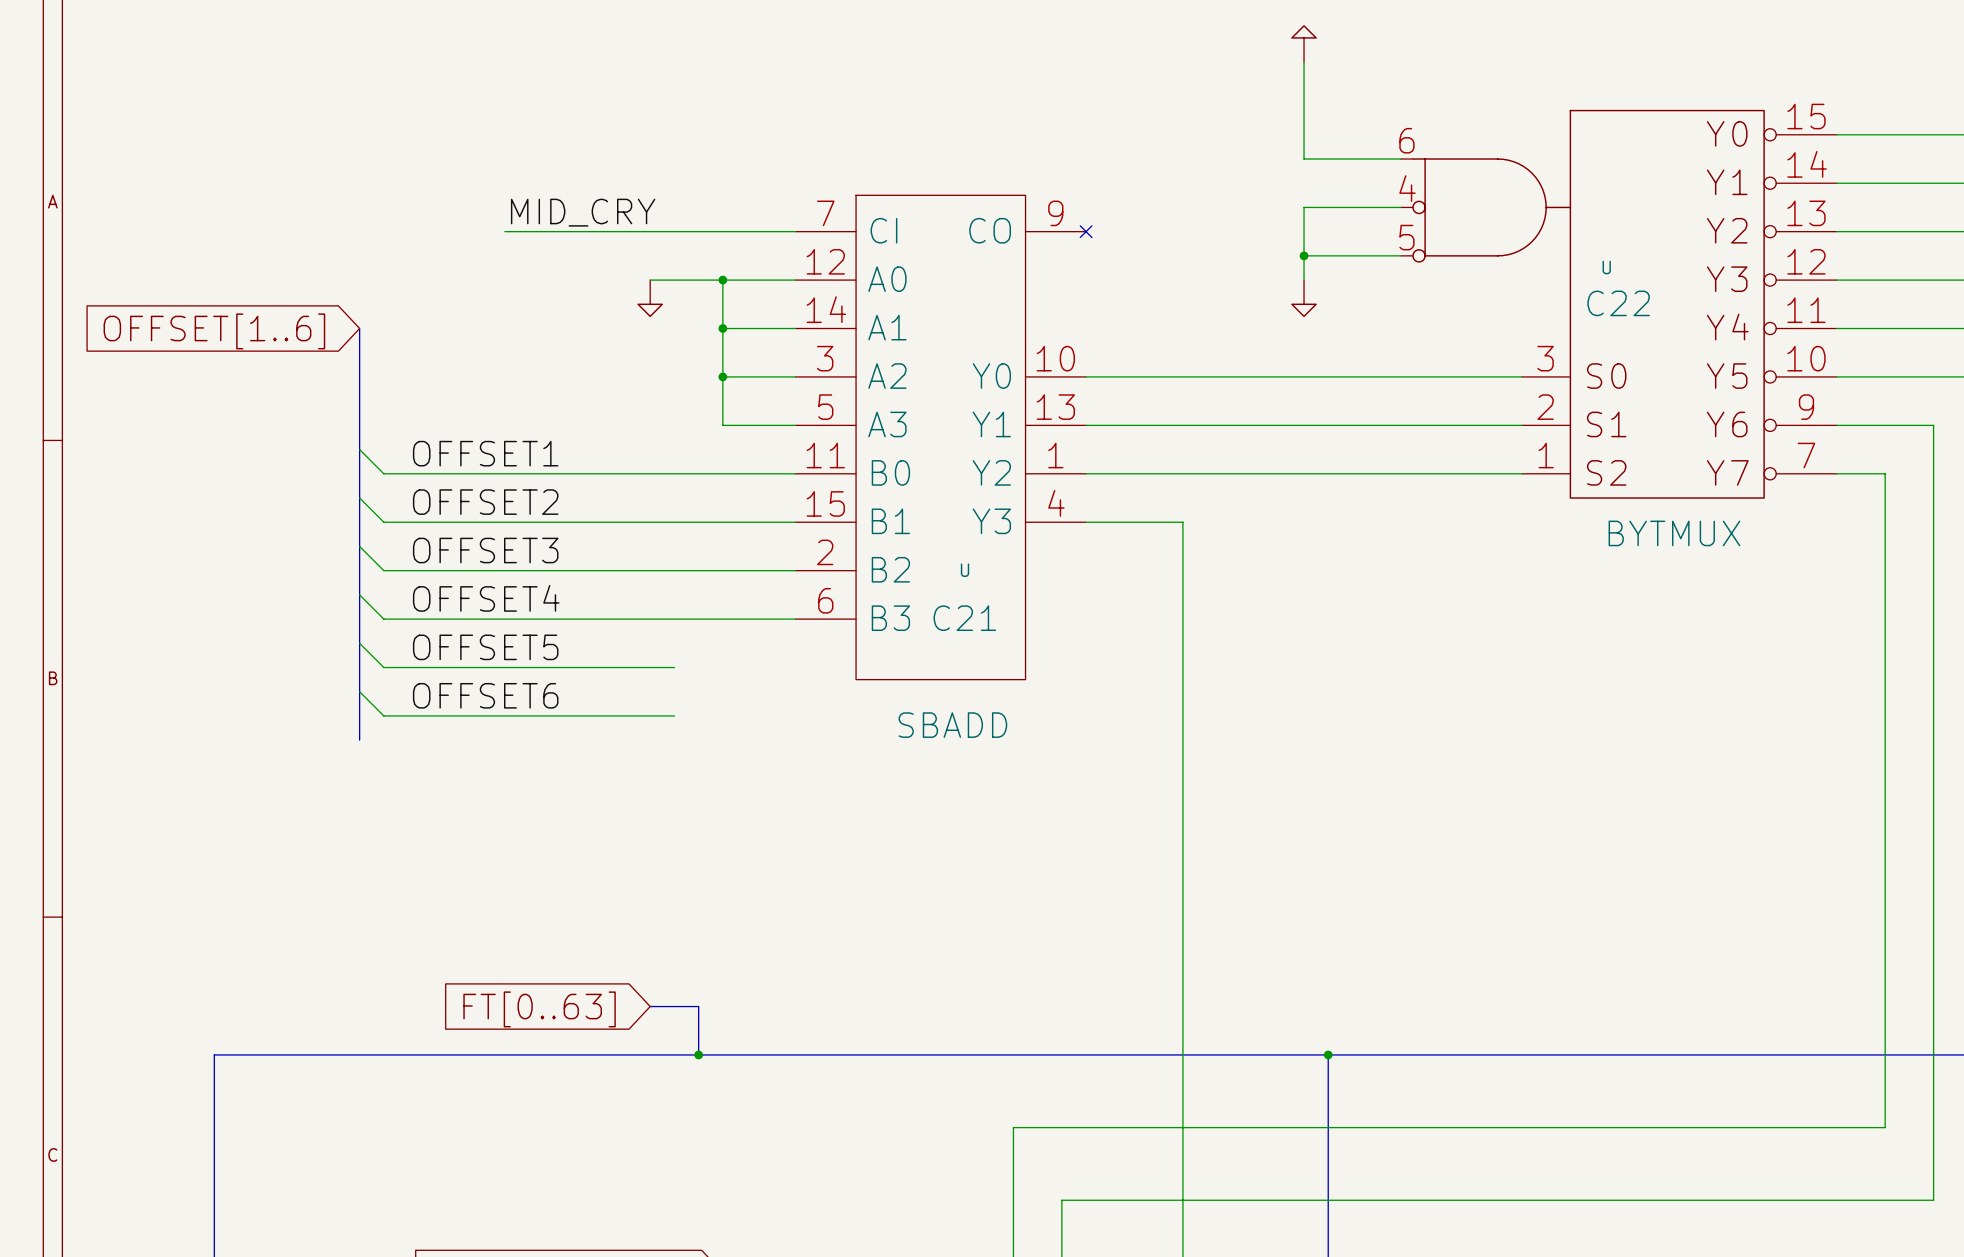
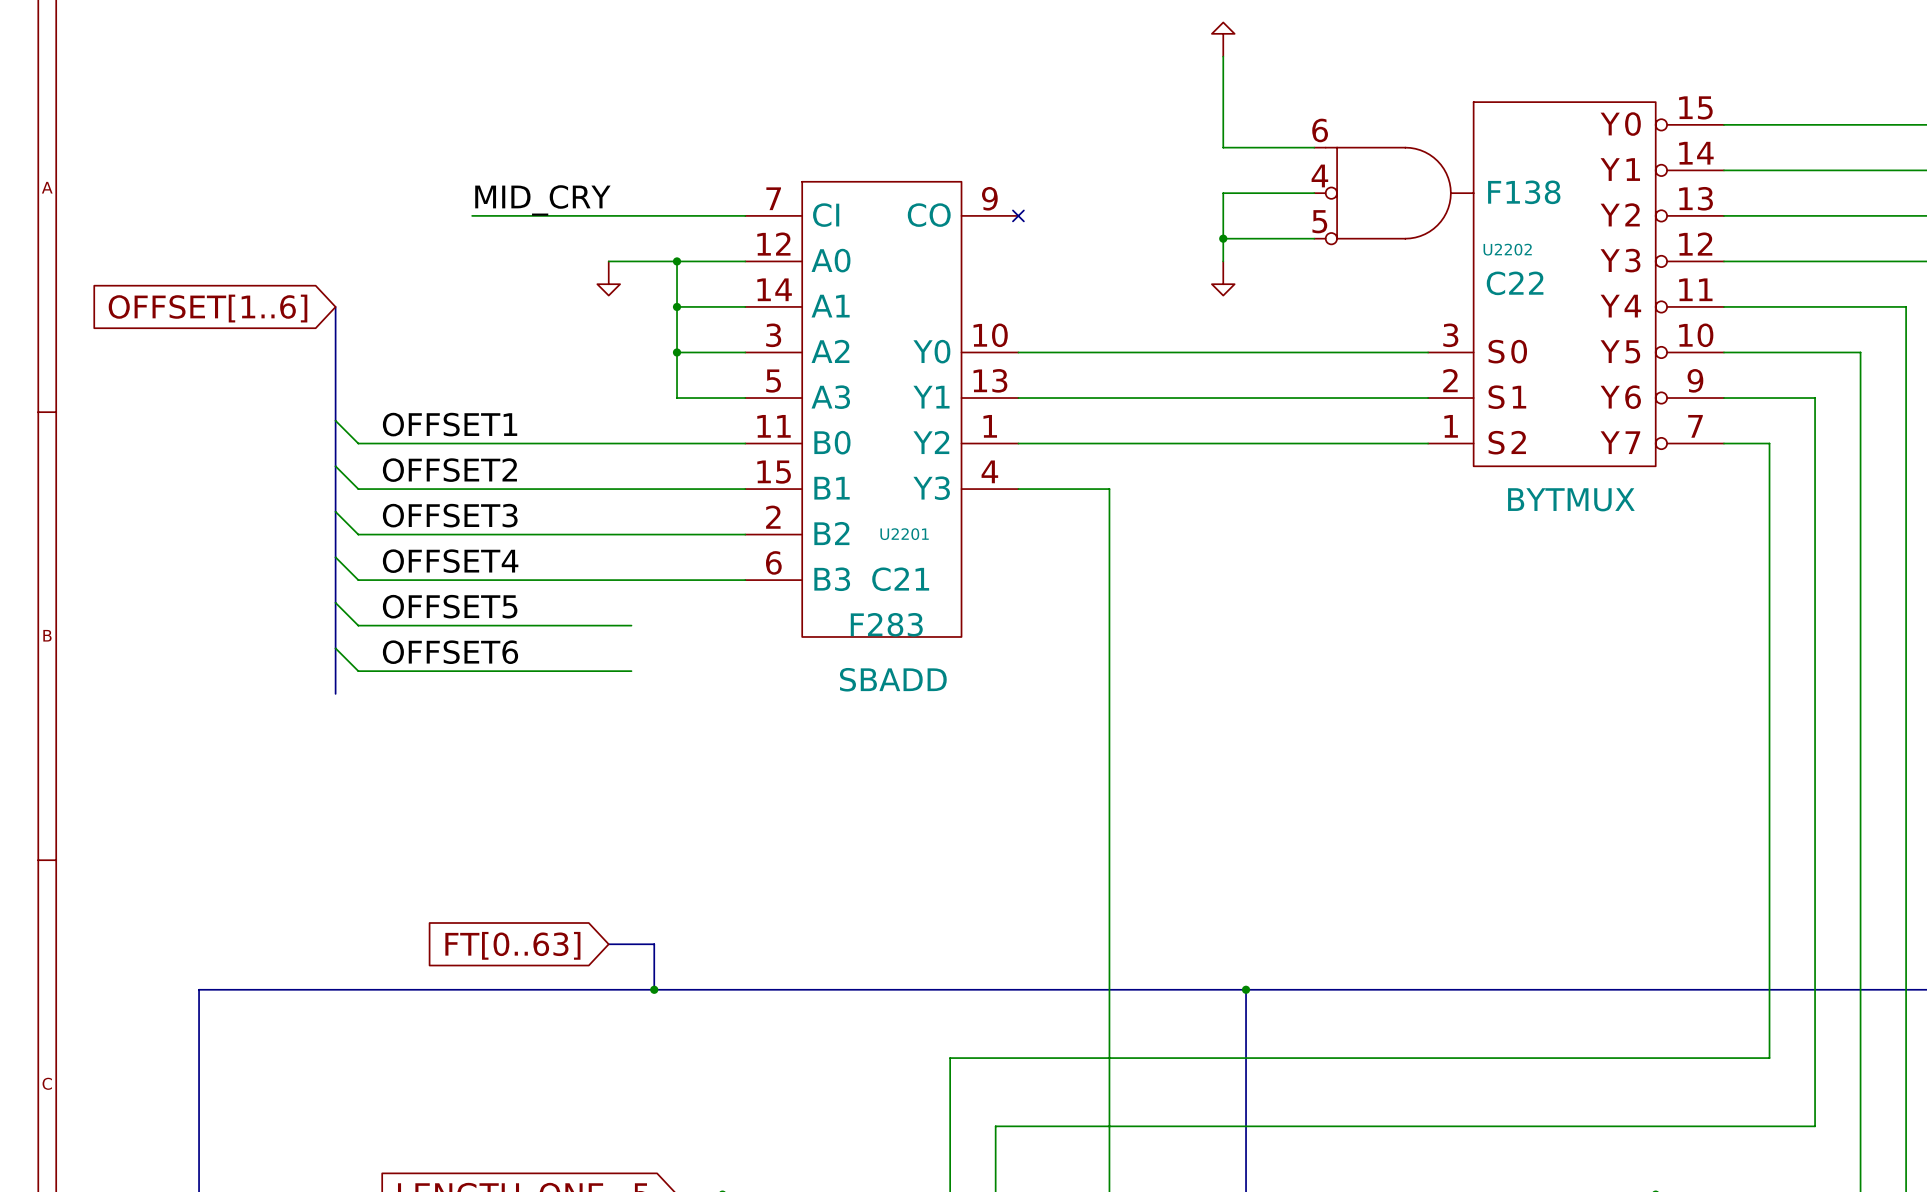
U value: none -> F138 (1524, 192)
U name: U (1606, 267) -> U2202 (1507, 249)
U name: U (965, 570) -> U2201 (904, 534)
U value: none -> F283 (886, 624)

